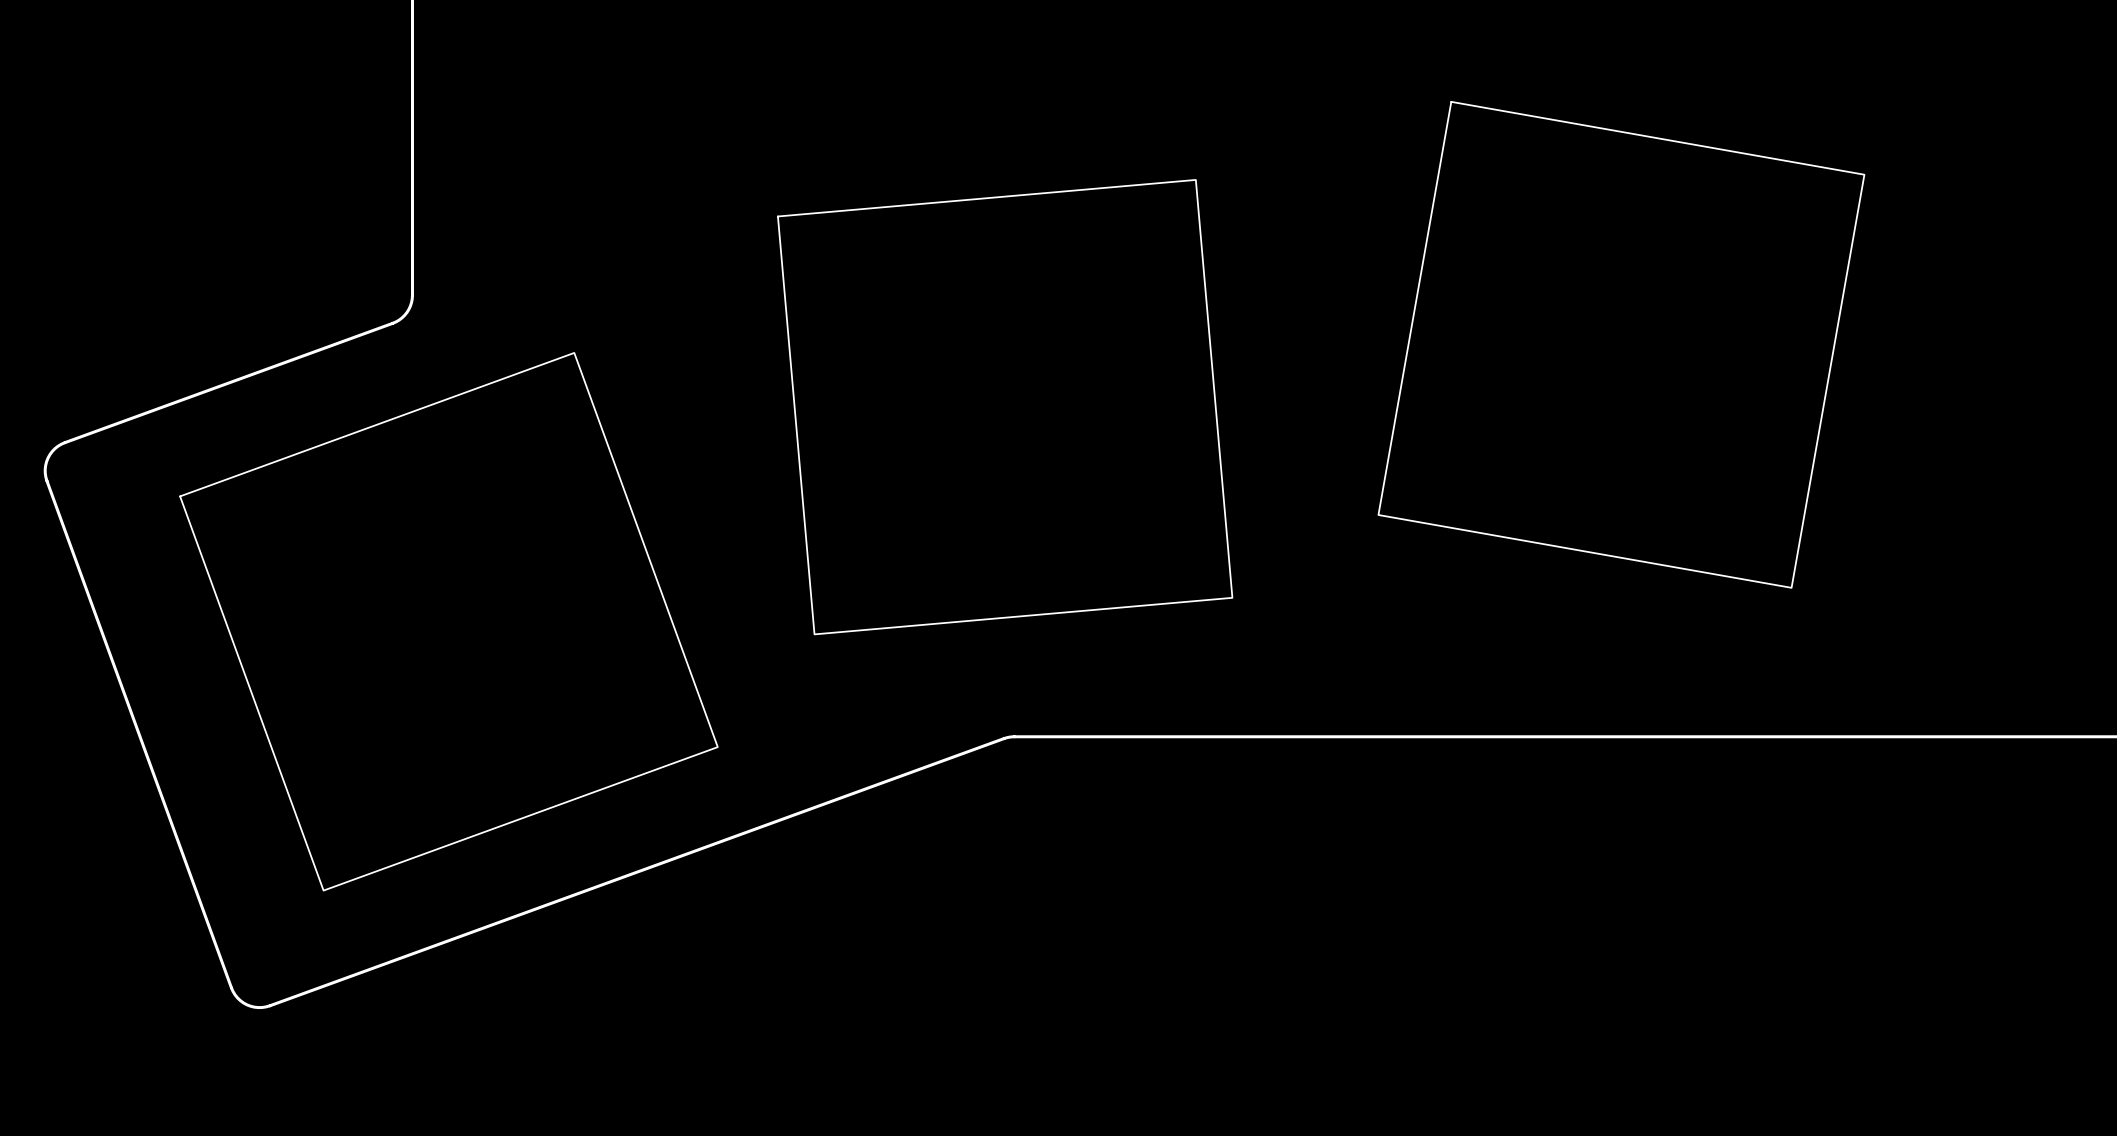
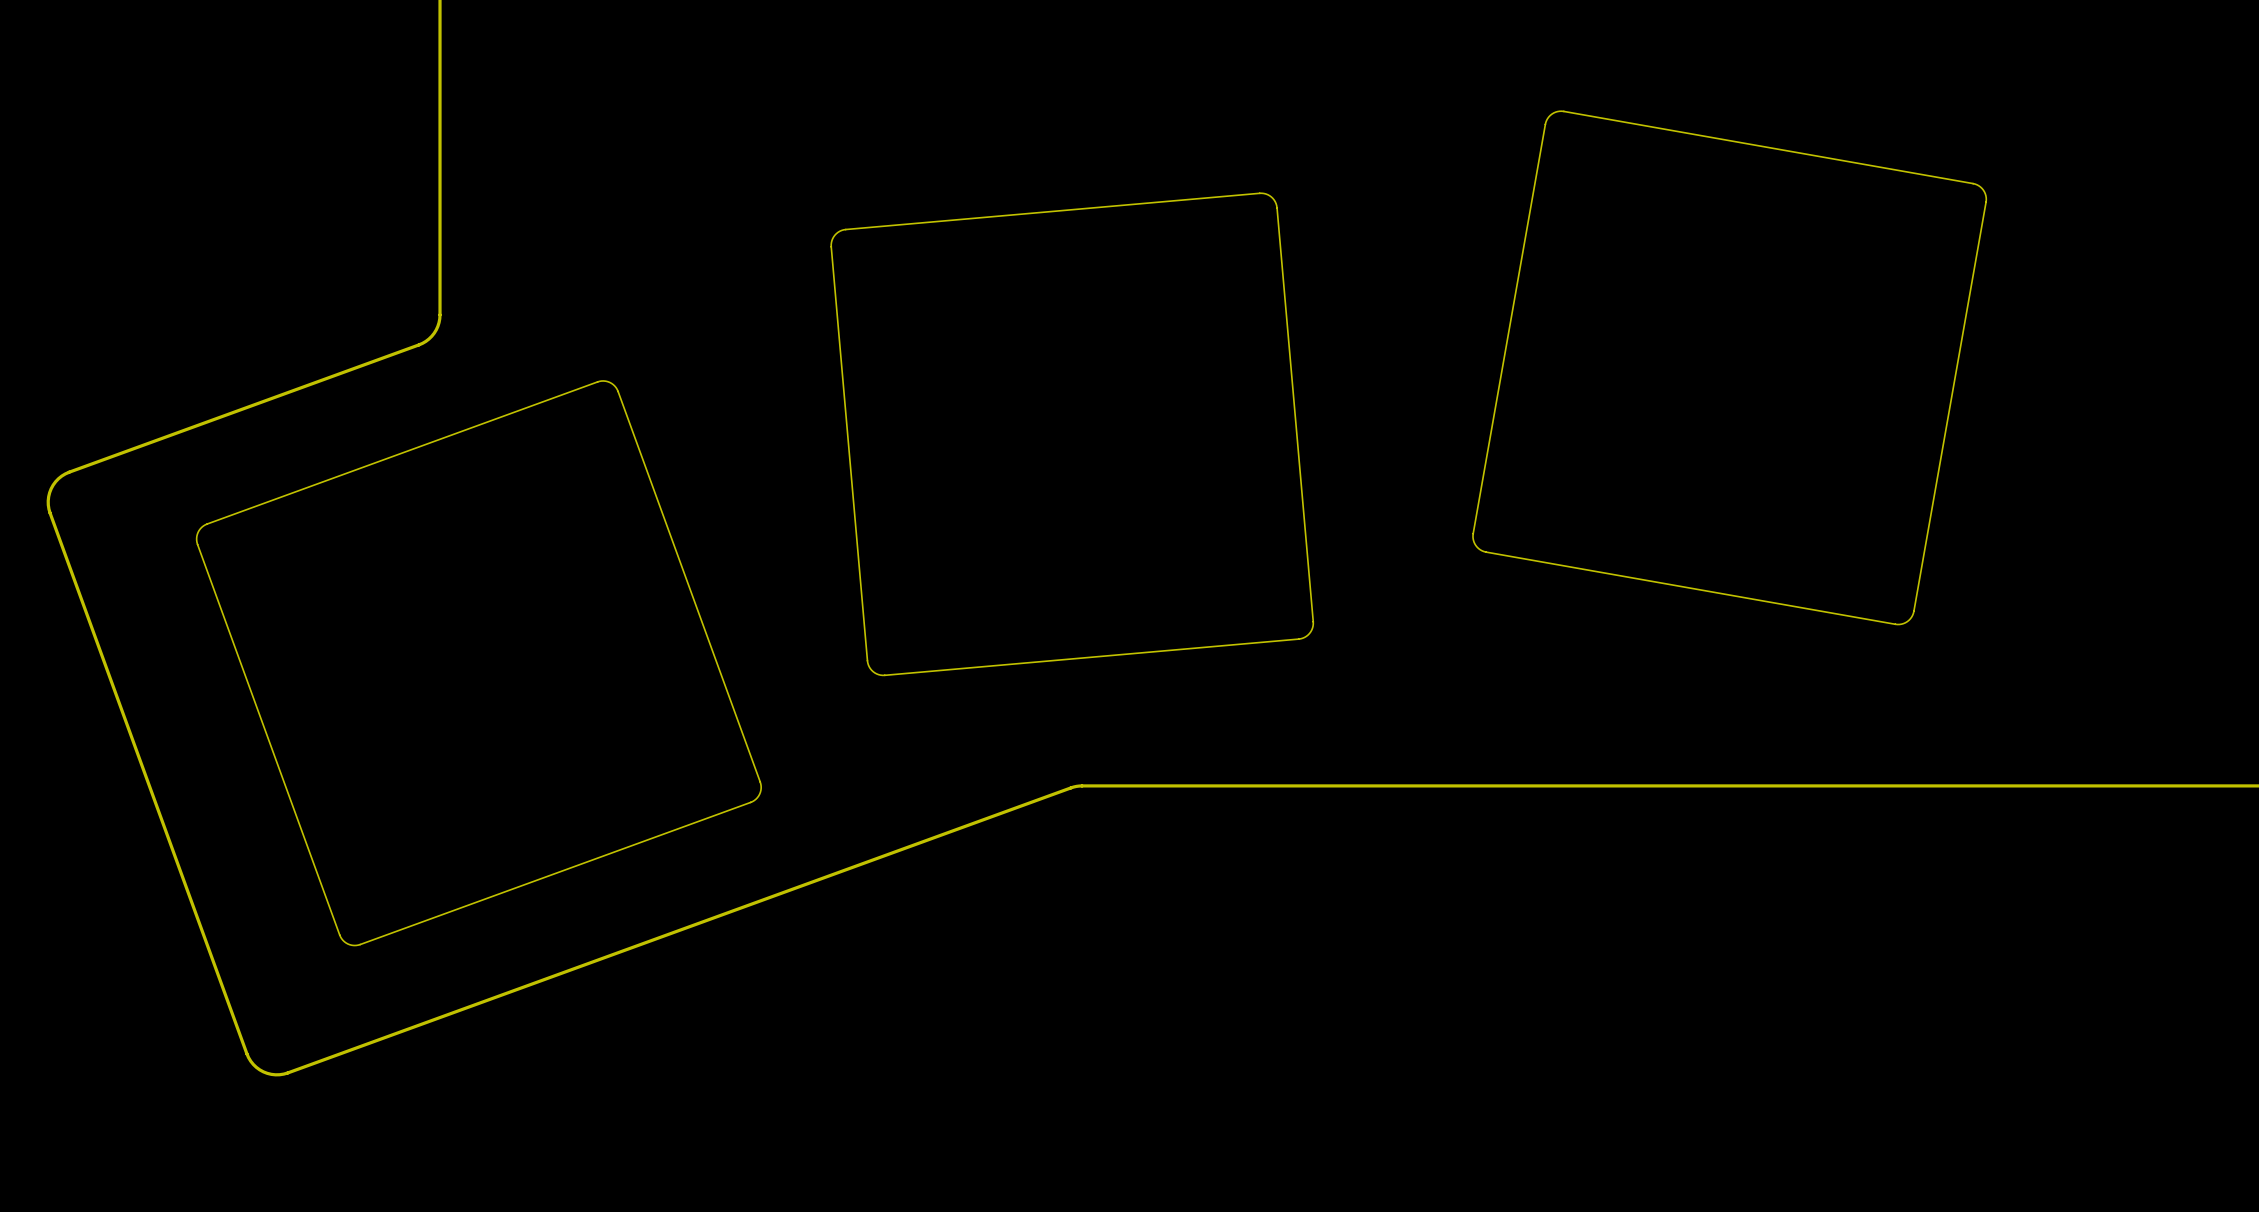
drawing shape: [1377, 101, 1866, 589] -> [1472, 110, 1988, 626]
drawing shape: [777, 179, 1234, 636] -> [830, 192, 1315, 677]
drawing shape: [179, 352, 719, 892] -> [195, 380, 762, 947]

